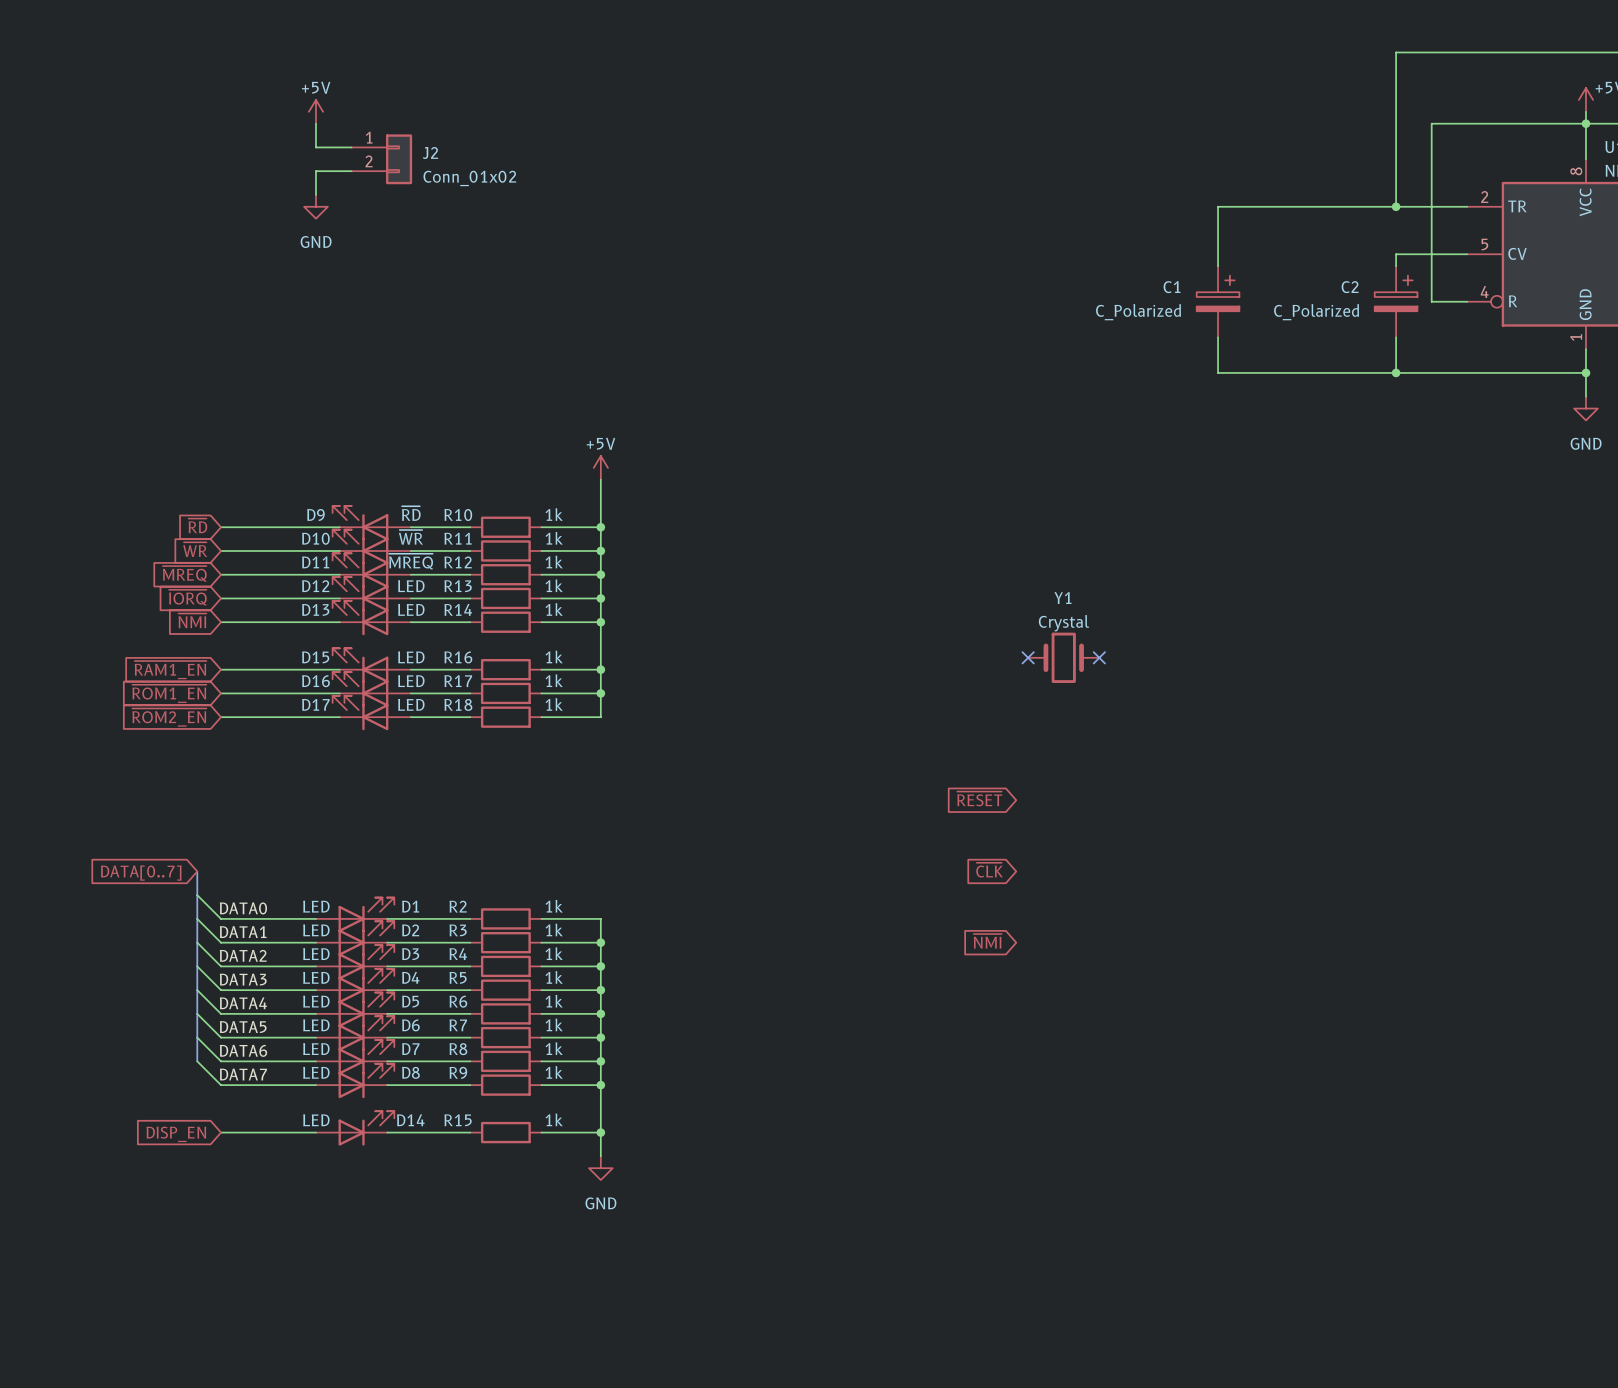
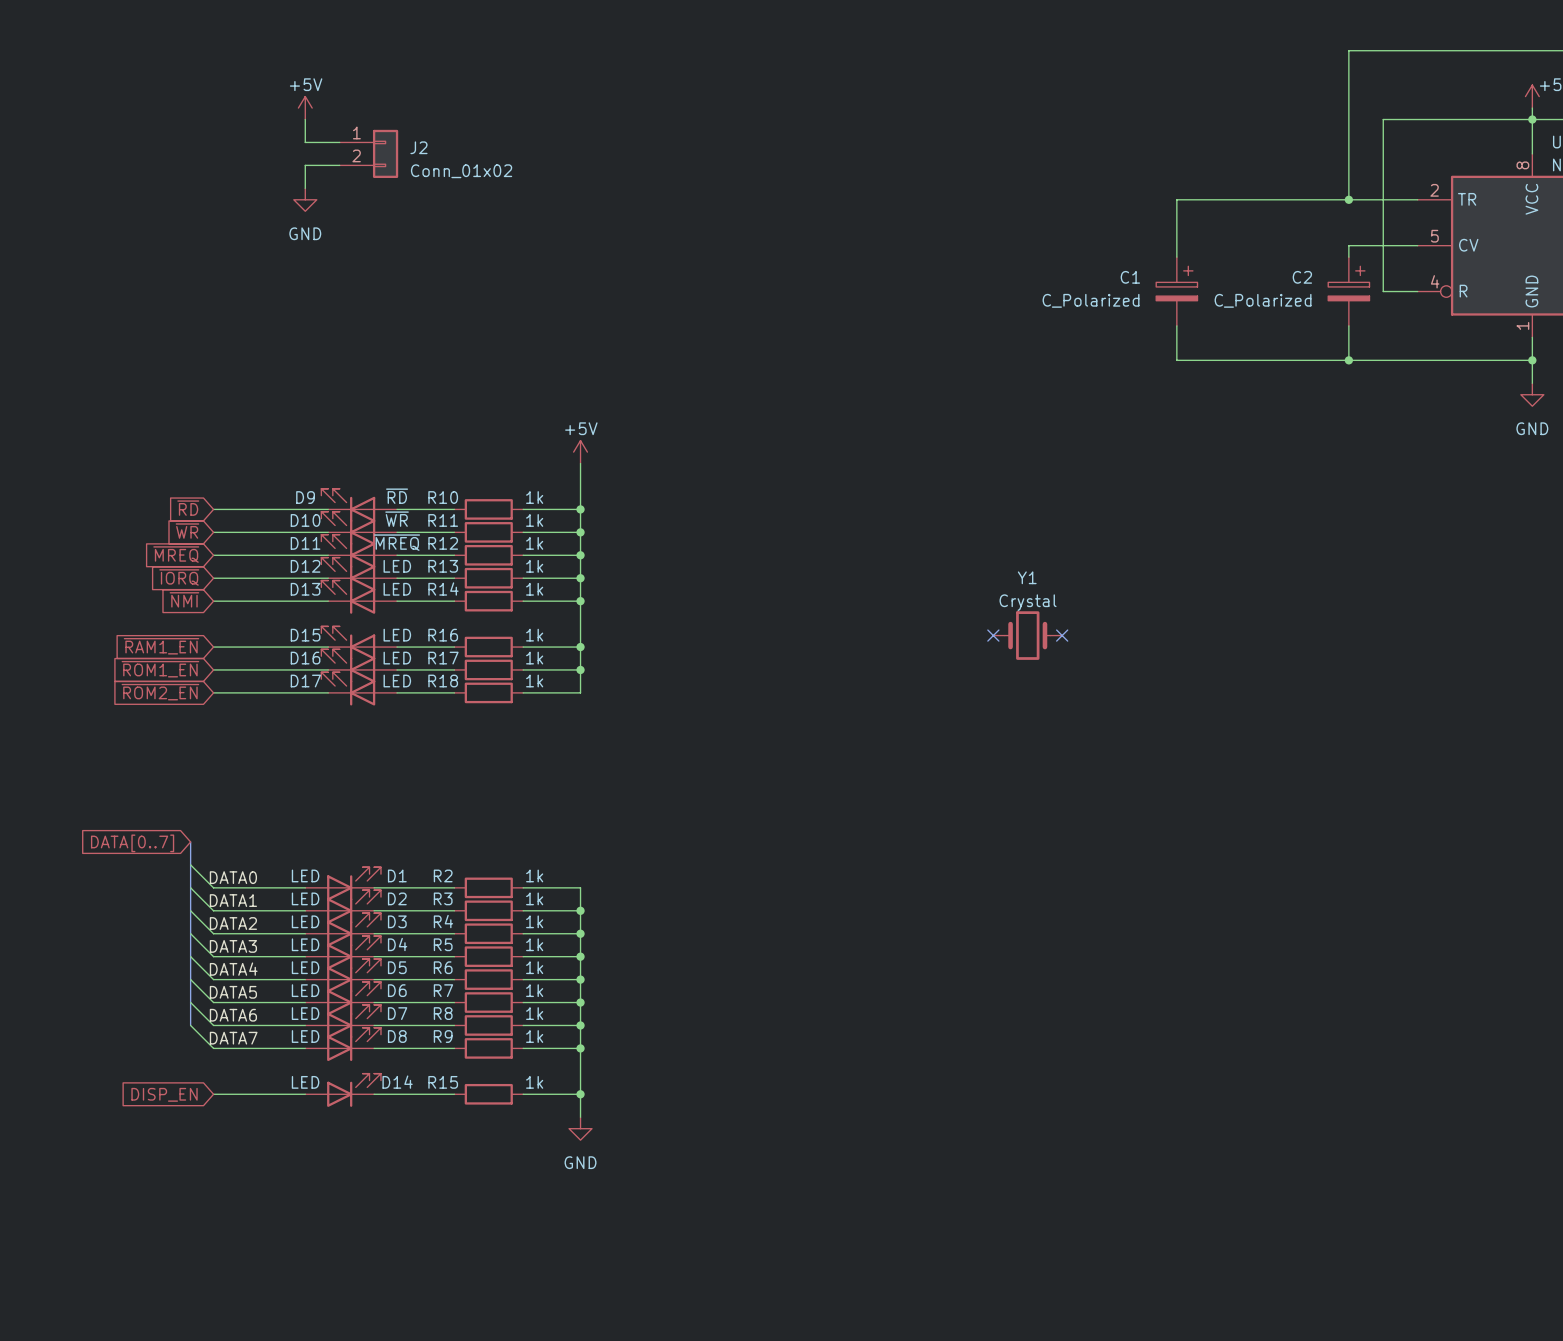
global label: ~{RESET} (979, 798) -> none
global label: ~{CLK} (989, 870) -> none
global label: ~{NMI} (987, 941) -> none

